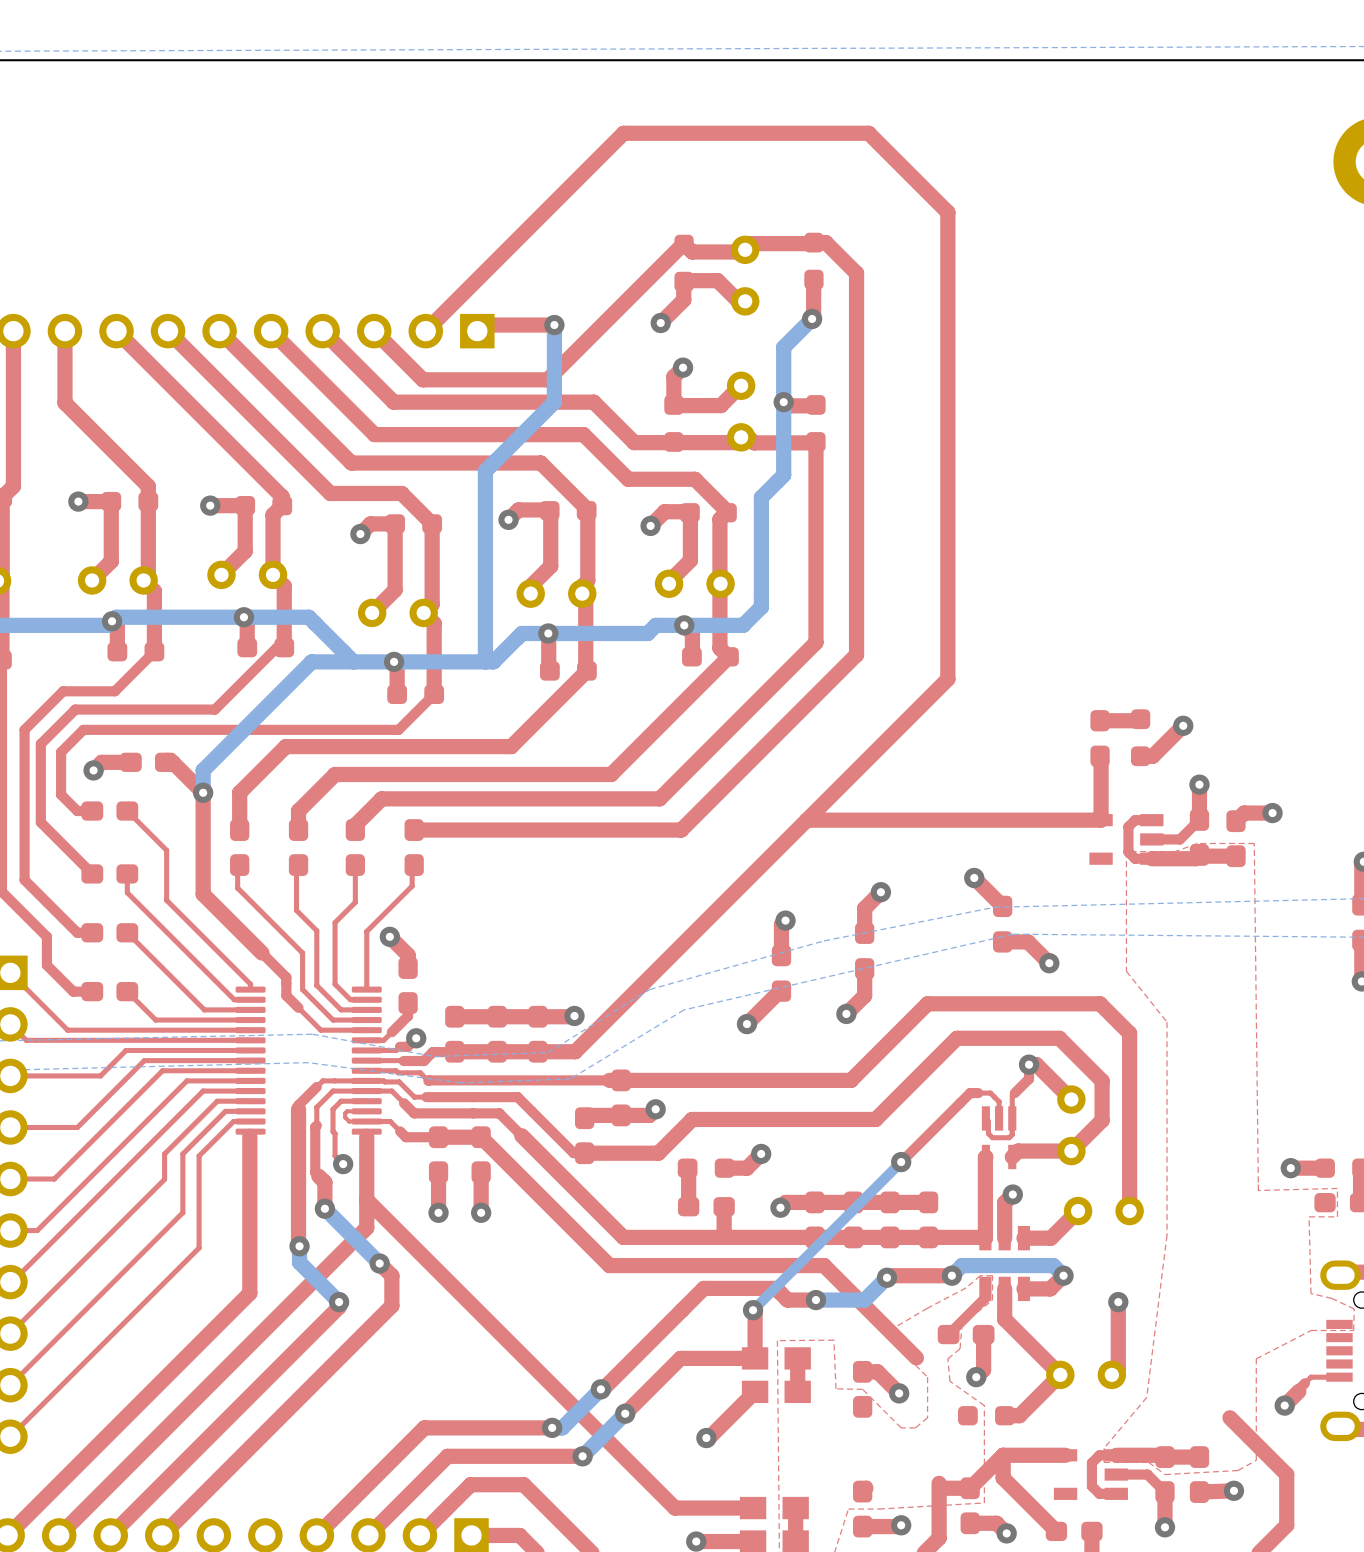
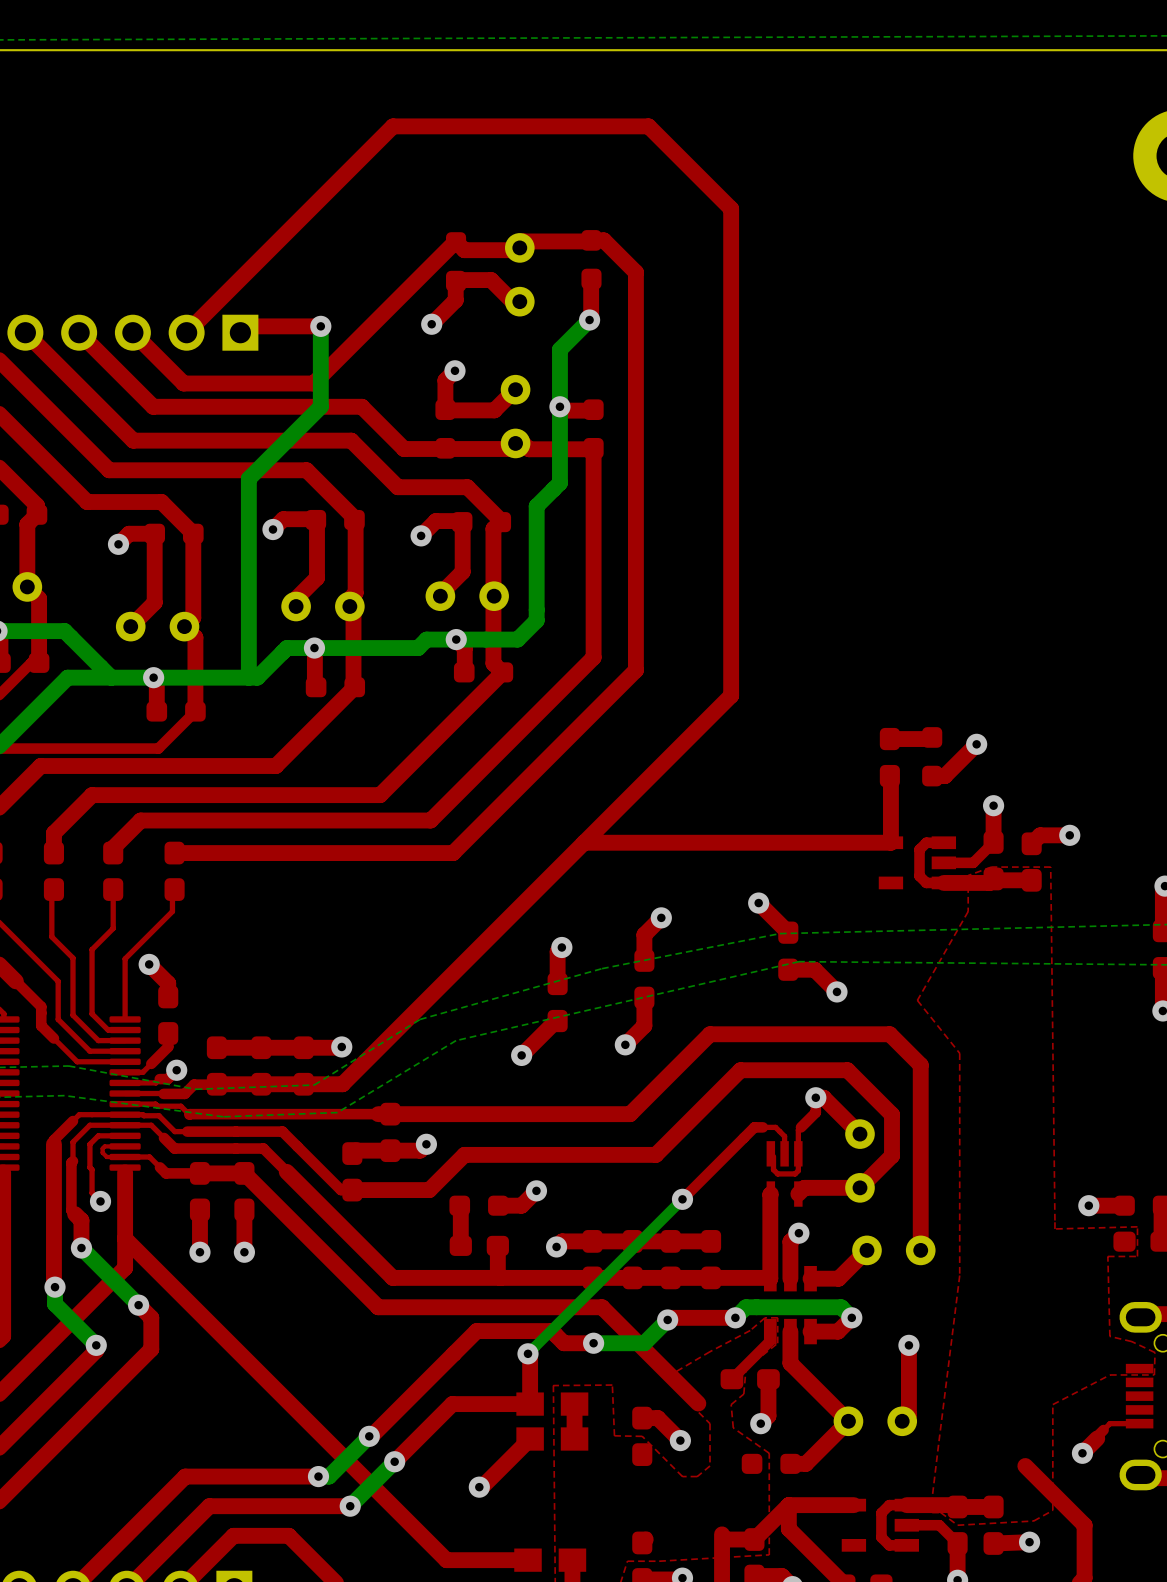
top zone outline: (1175, 851) (1126, 851) (1126, 971) -> (968, 875) (968, 911) (917, 1000)
top zone outline: (1146, 1397) (1104, 1448) (1104, 1462) (1140, 1462) -> (938, 1444) (932, 1512)

